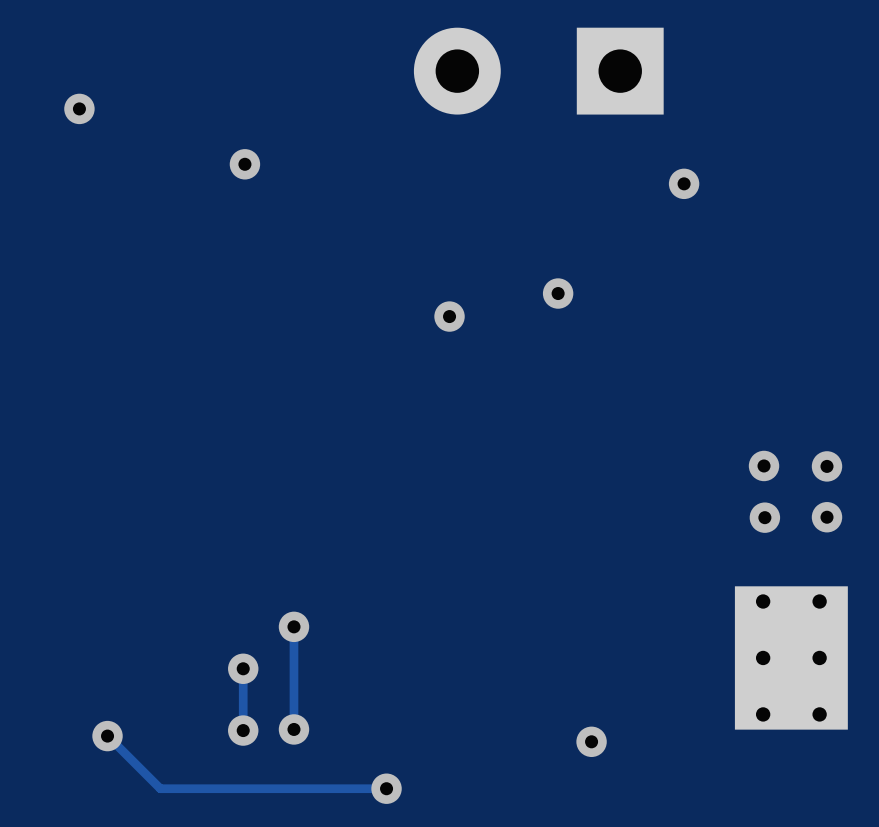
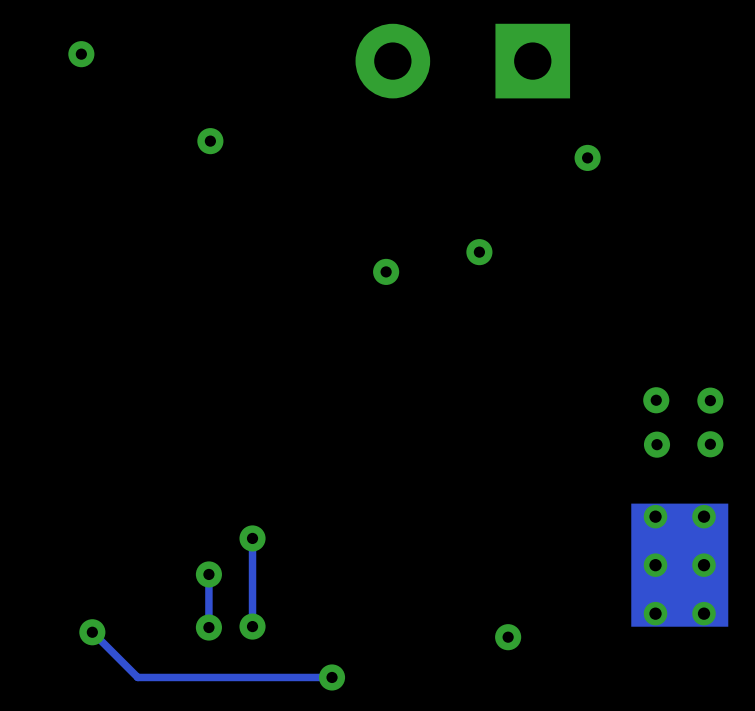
via position: (79, 108) -> (81, 54)

